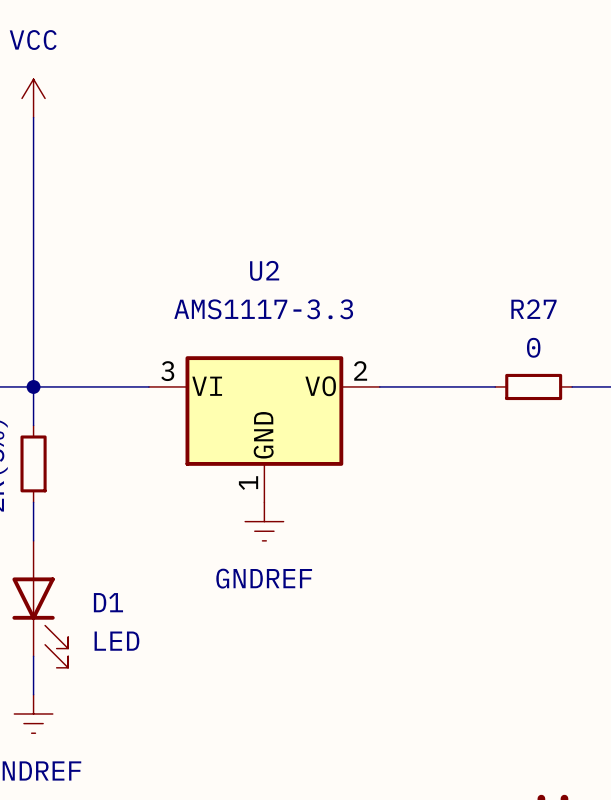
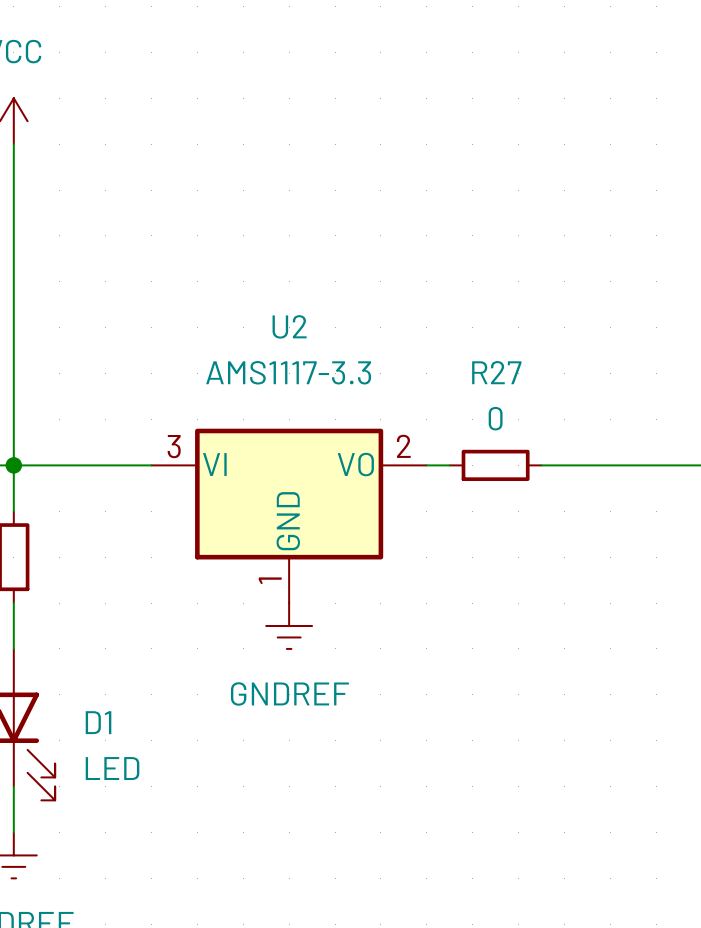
wire: (399, 386) (475, 386) -> (564, 465) (656, 465)
R27 position: (533, 386) -> (495, 465)

